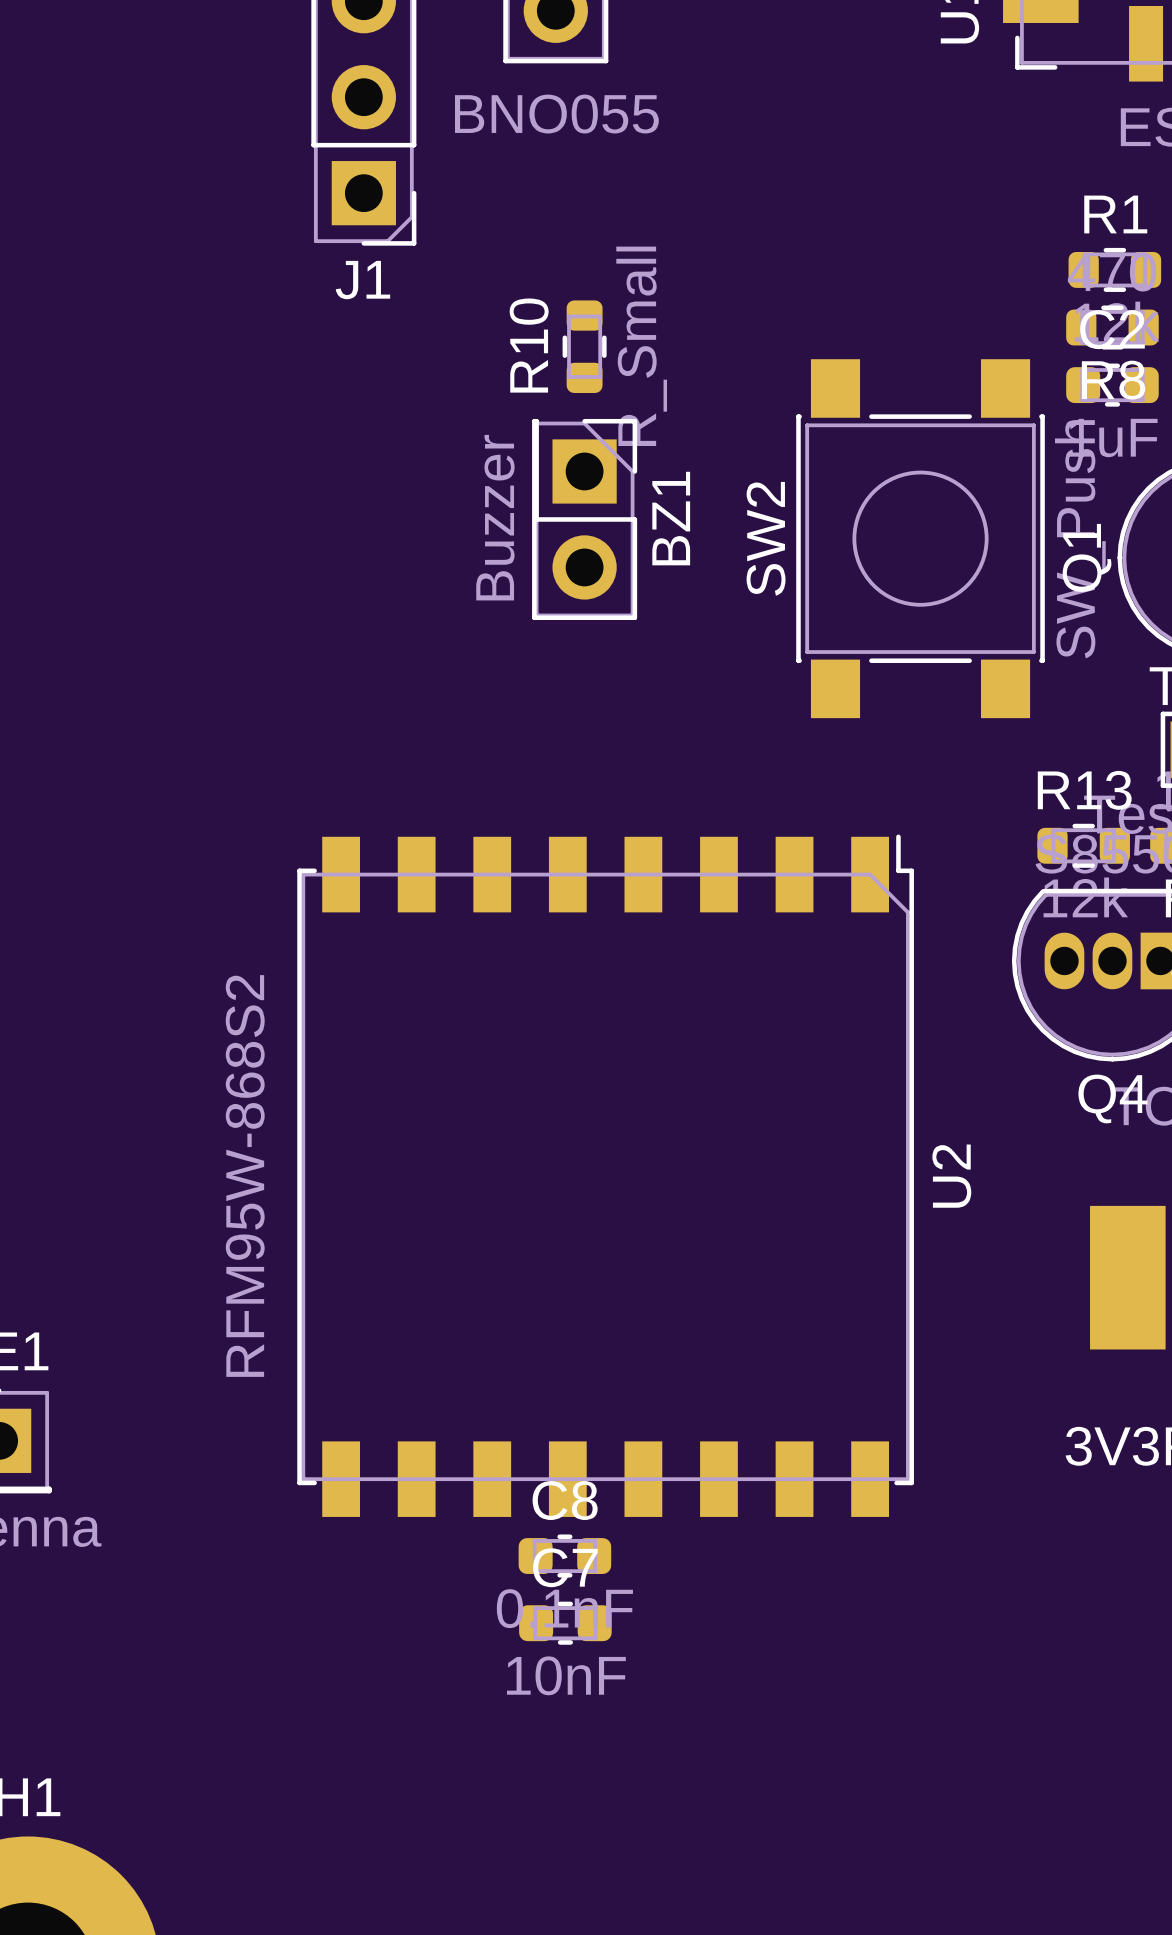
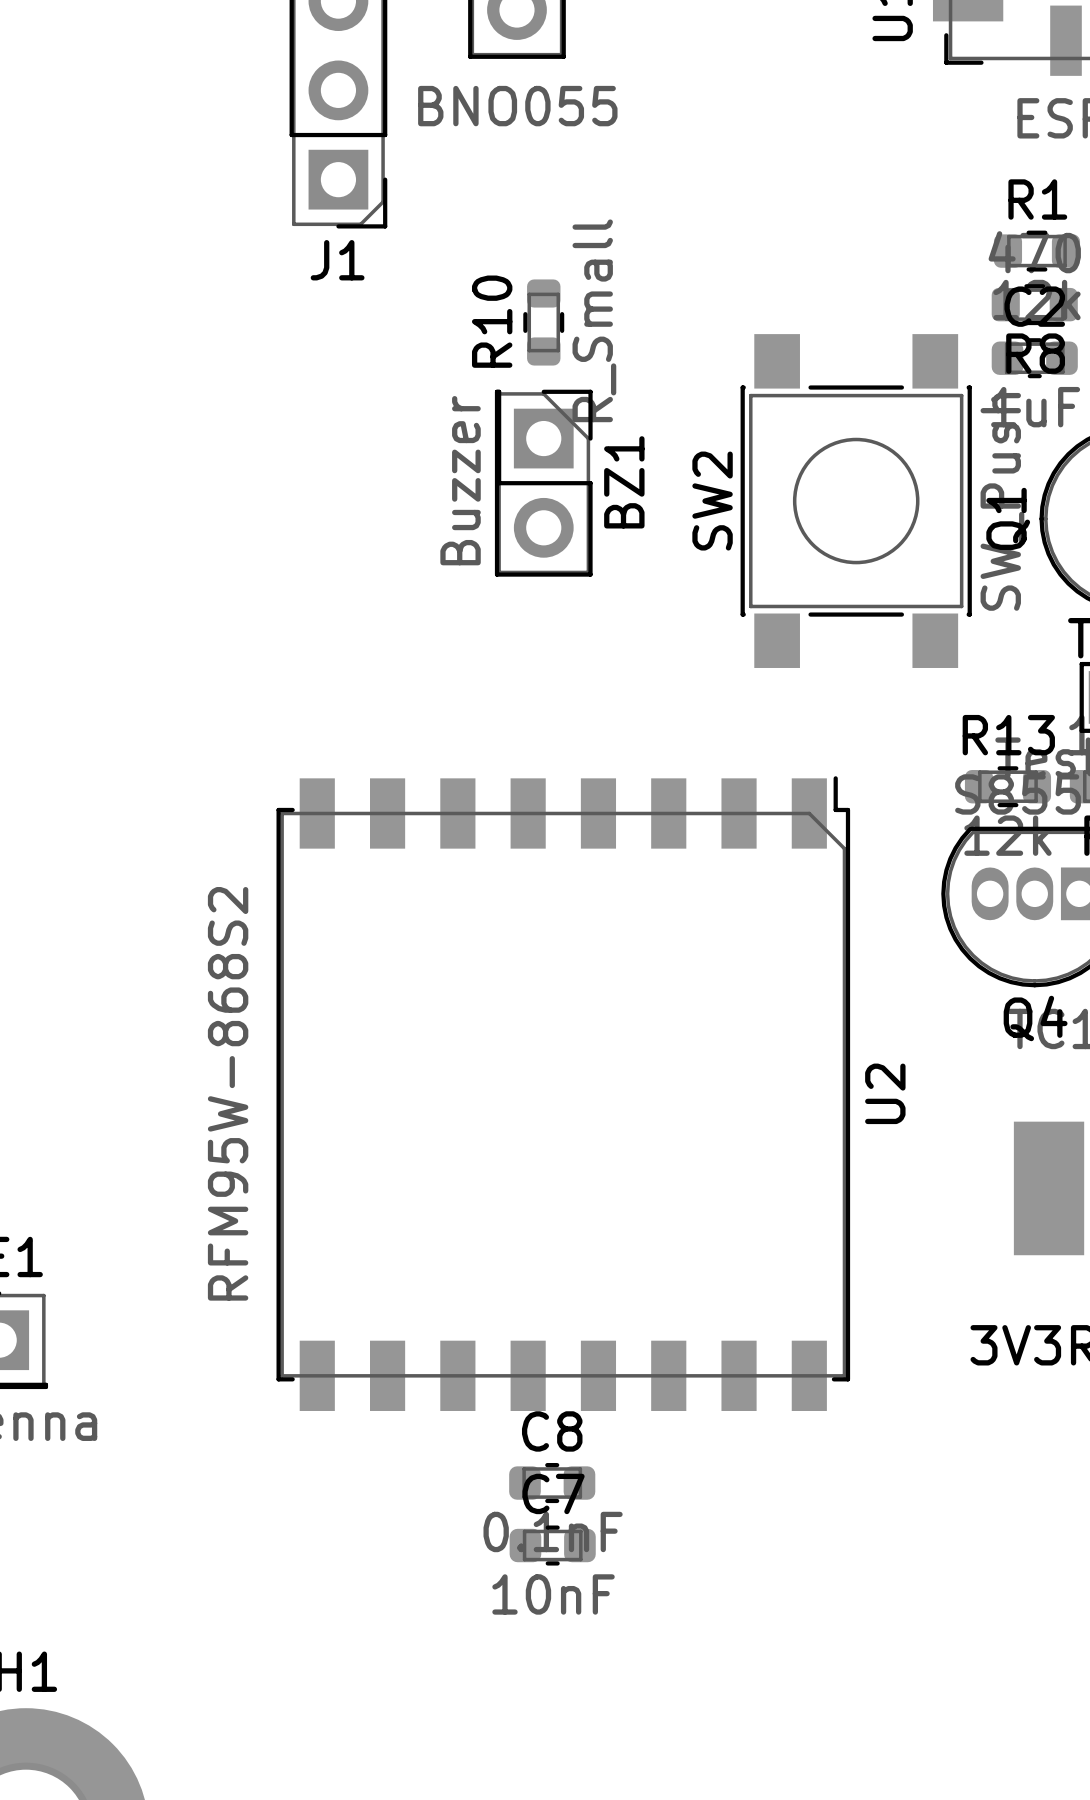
C8 position: (564, 1556) -> (552, 1483)
C7 position: (565, 1623) -> (552, 1545)

